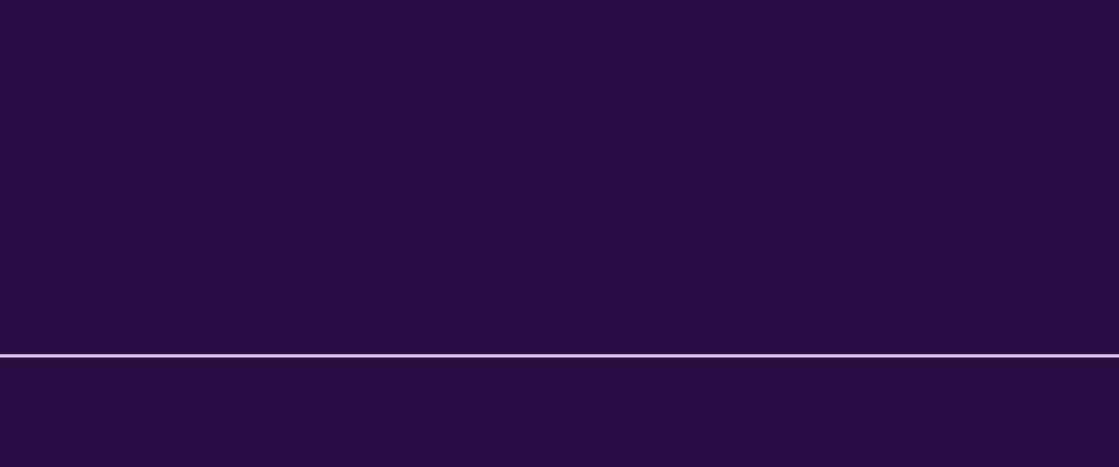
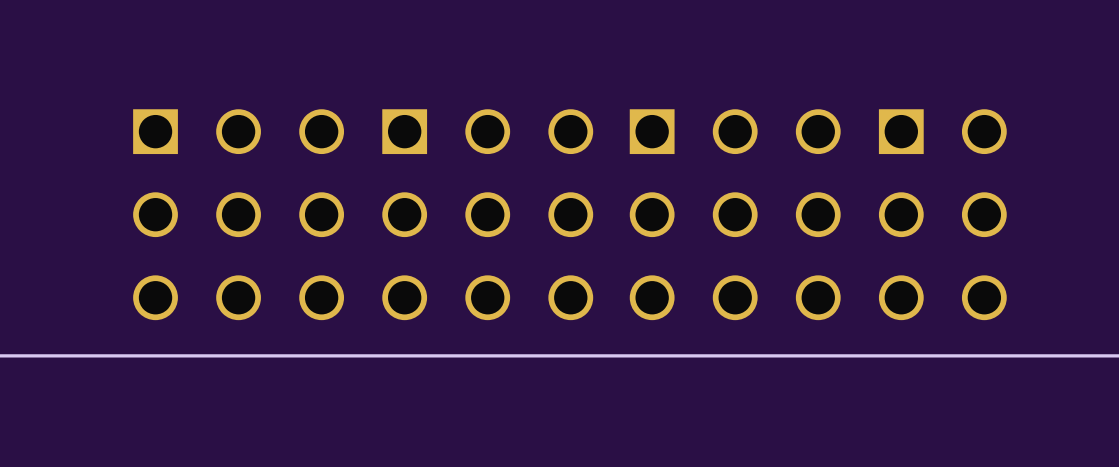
part: none -> (238, 214)
part: none -> (487, 214)
part: none -> (735, 214)
part: none -> (942, 214)

